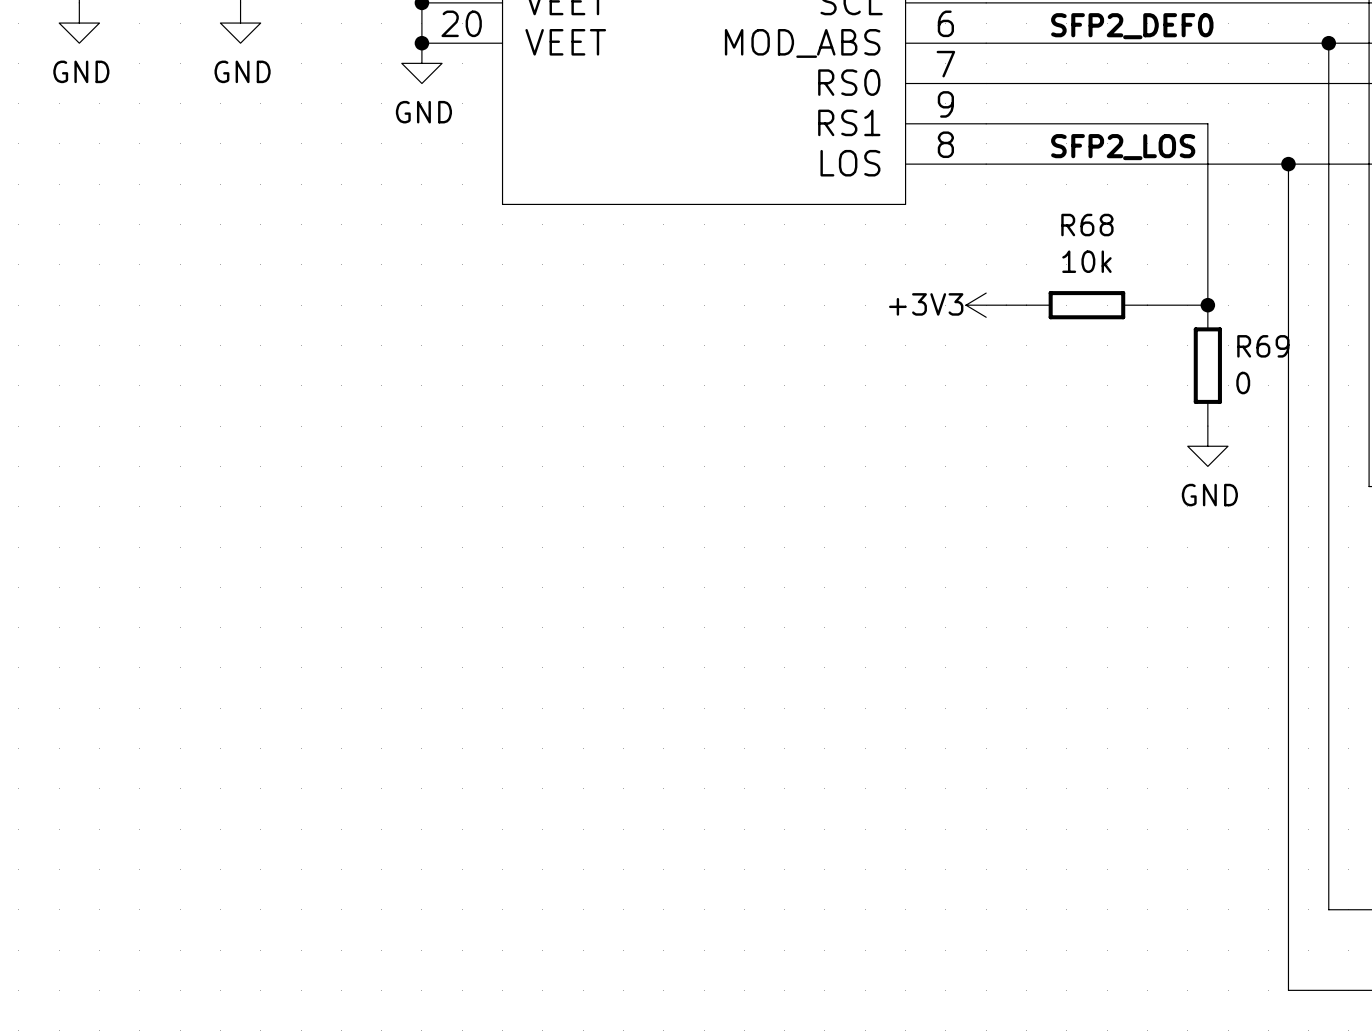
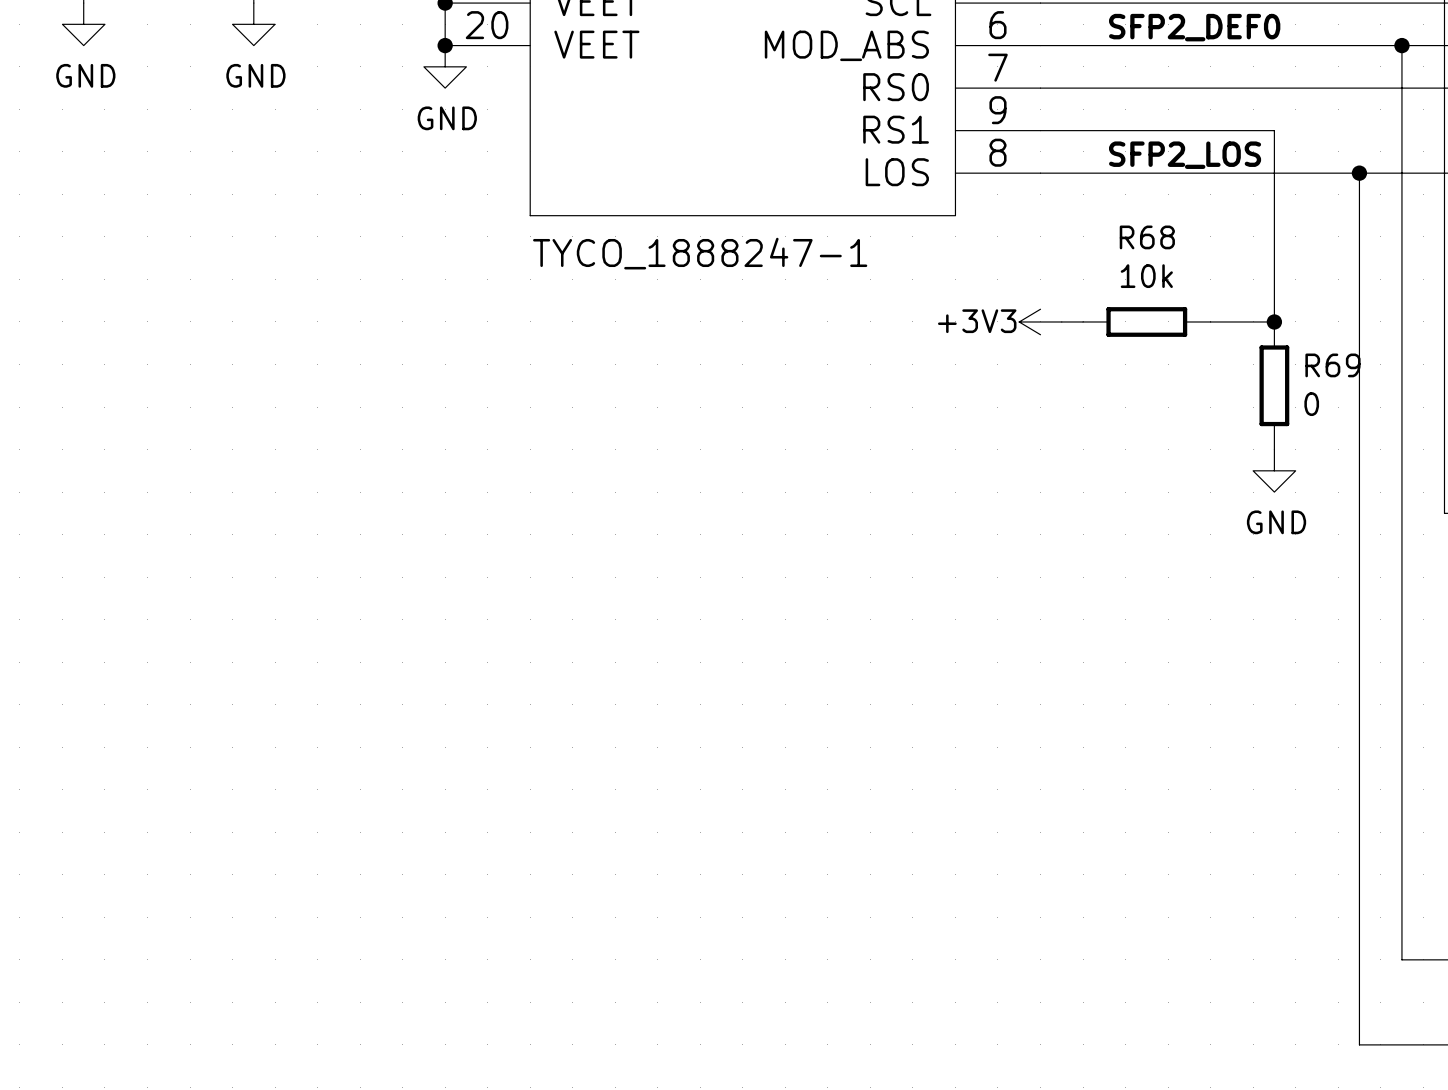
part value: none -> TYCO_1888247-1 (700, 253)

